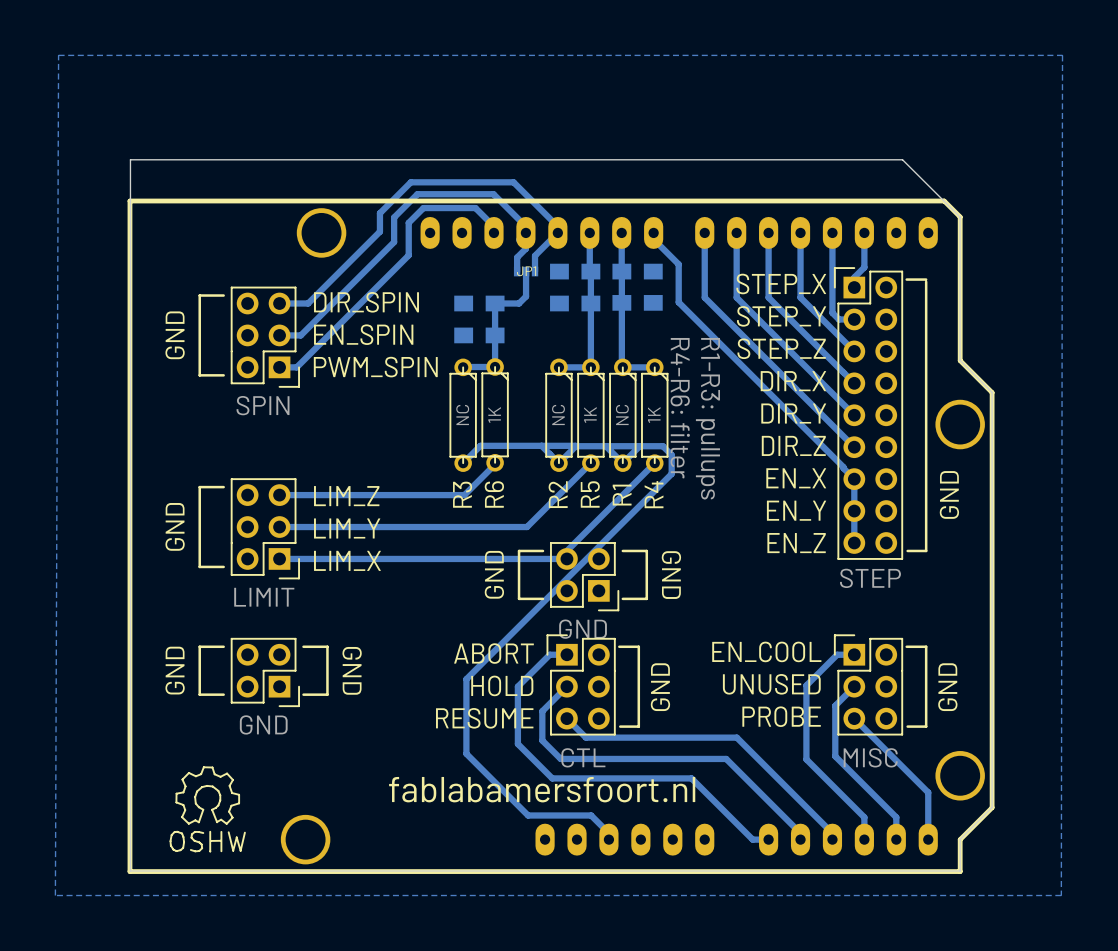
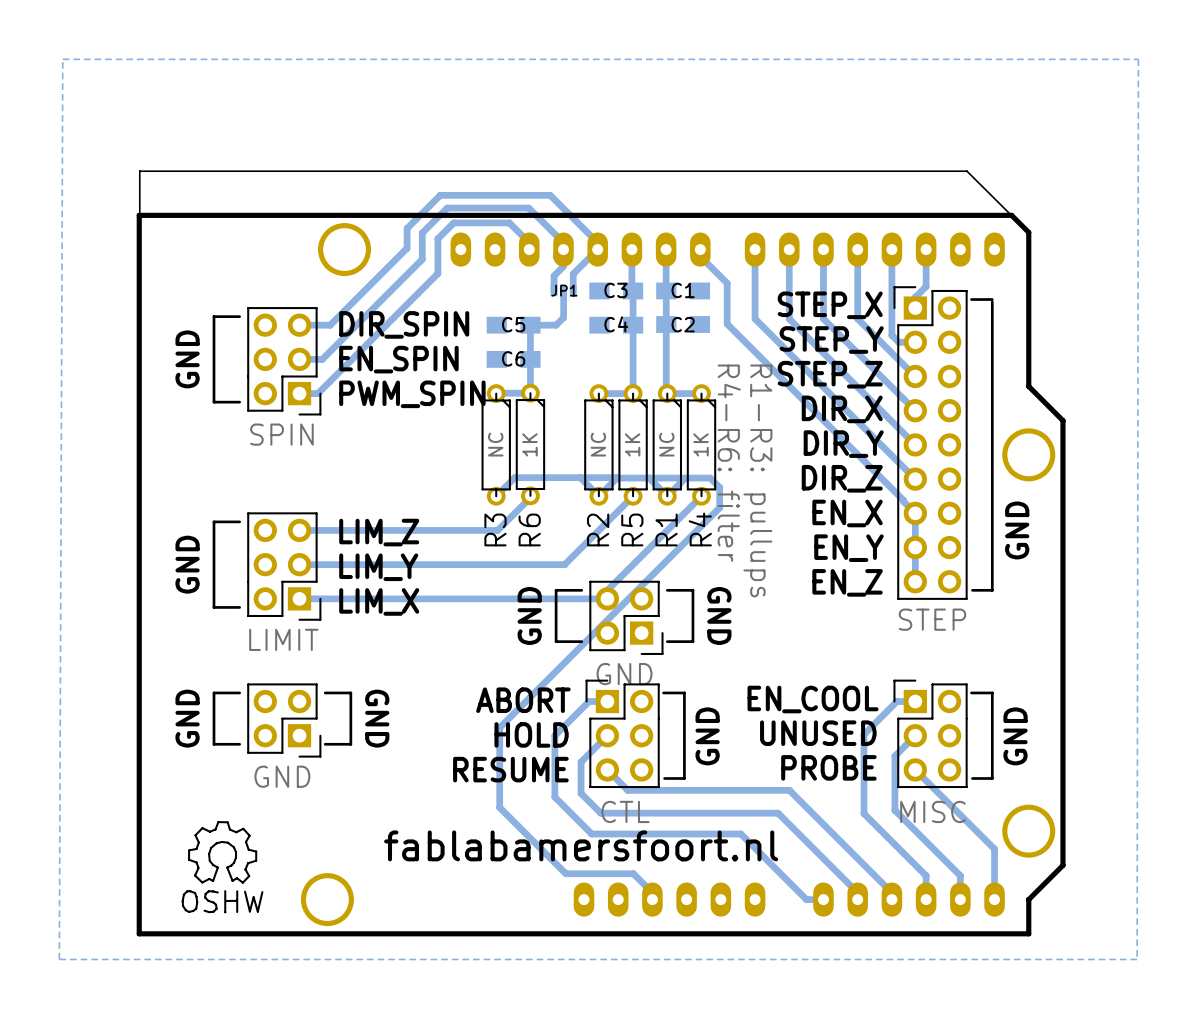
C3 name: none -> C3 (615, 290)
C1 name: none -> C1 (683, 290)
C5 name: none -> C5 (513, 324)
C4 name: none -> C4 (616, 324)
C2 name: none -> C2 (683, 324)
C6 name: none -> C6 (513, 358)

